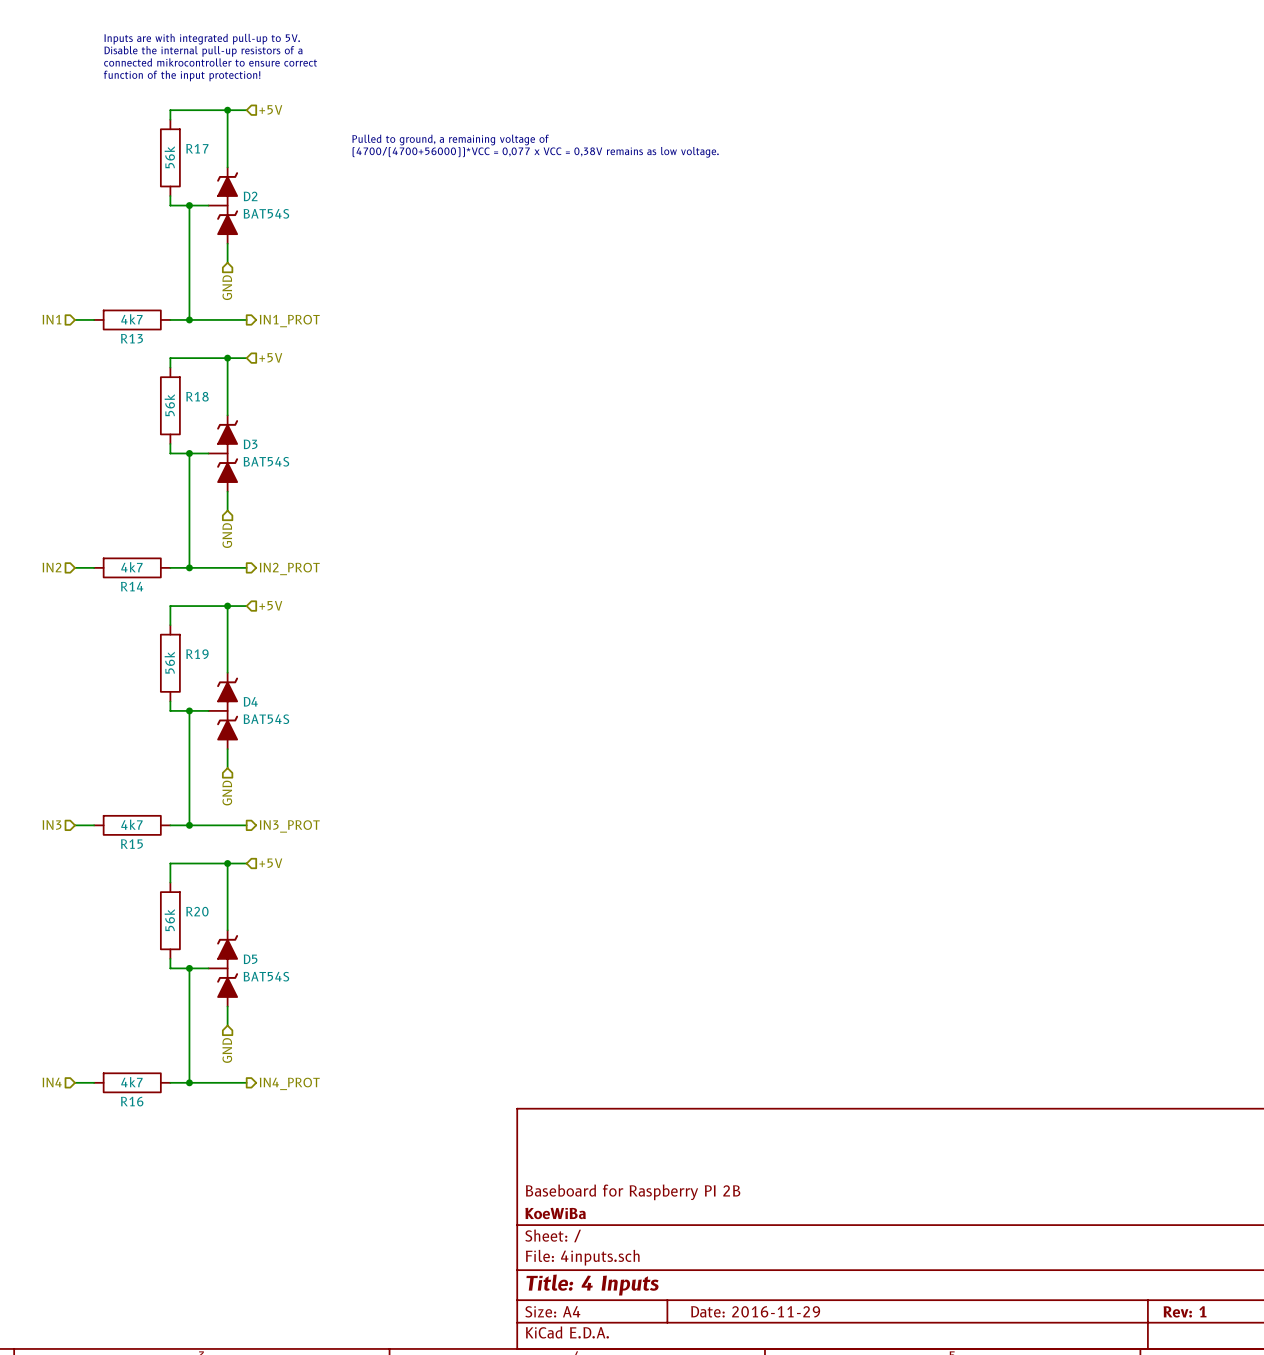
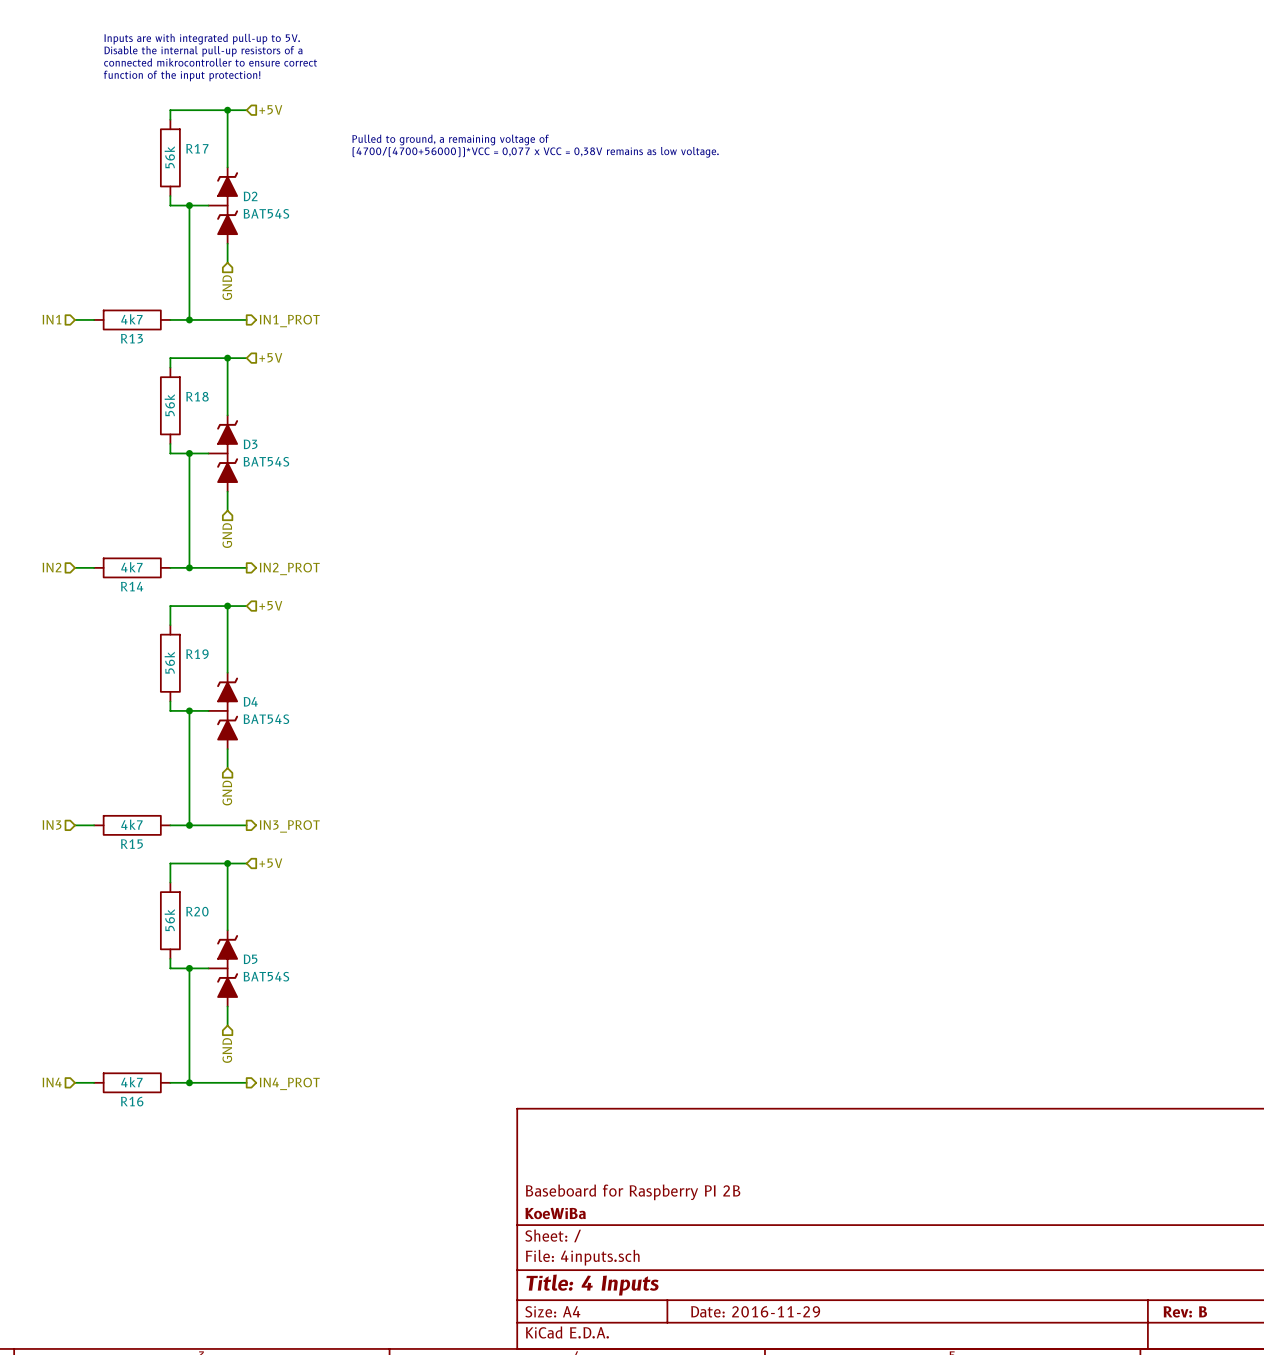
title block: Rev: 1 (1185, 1311) -> Rev: B (1185, 1311)

